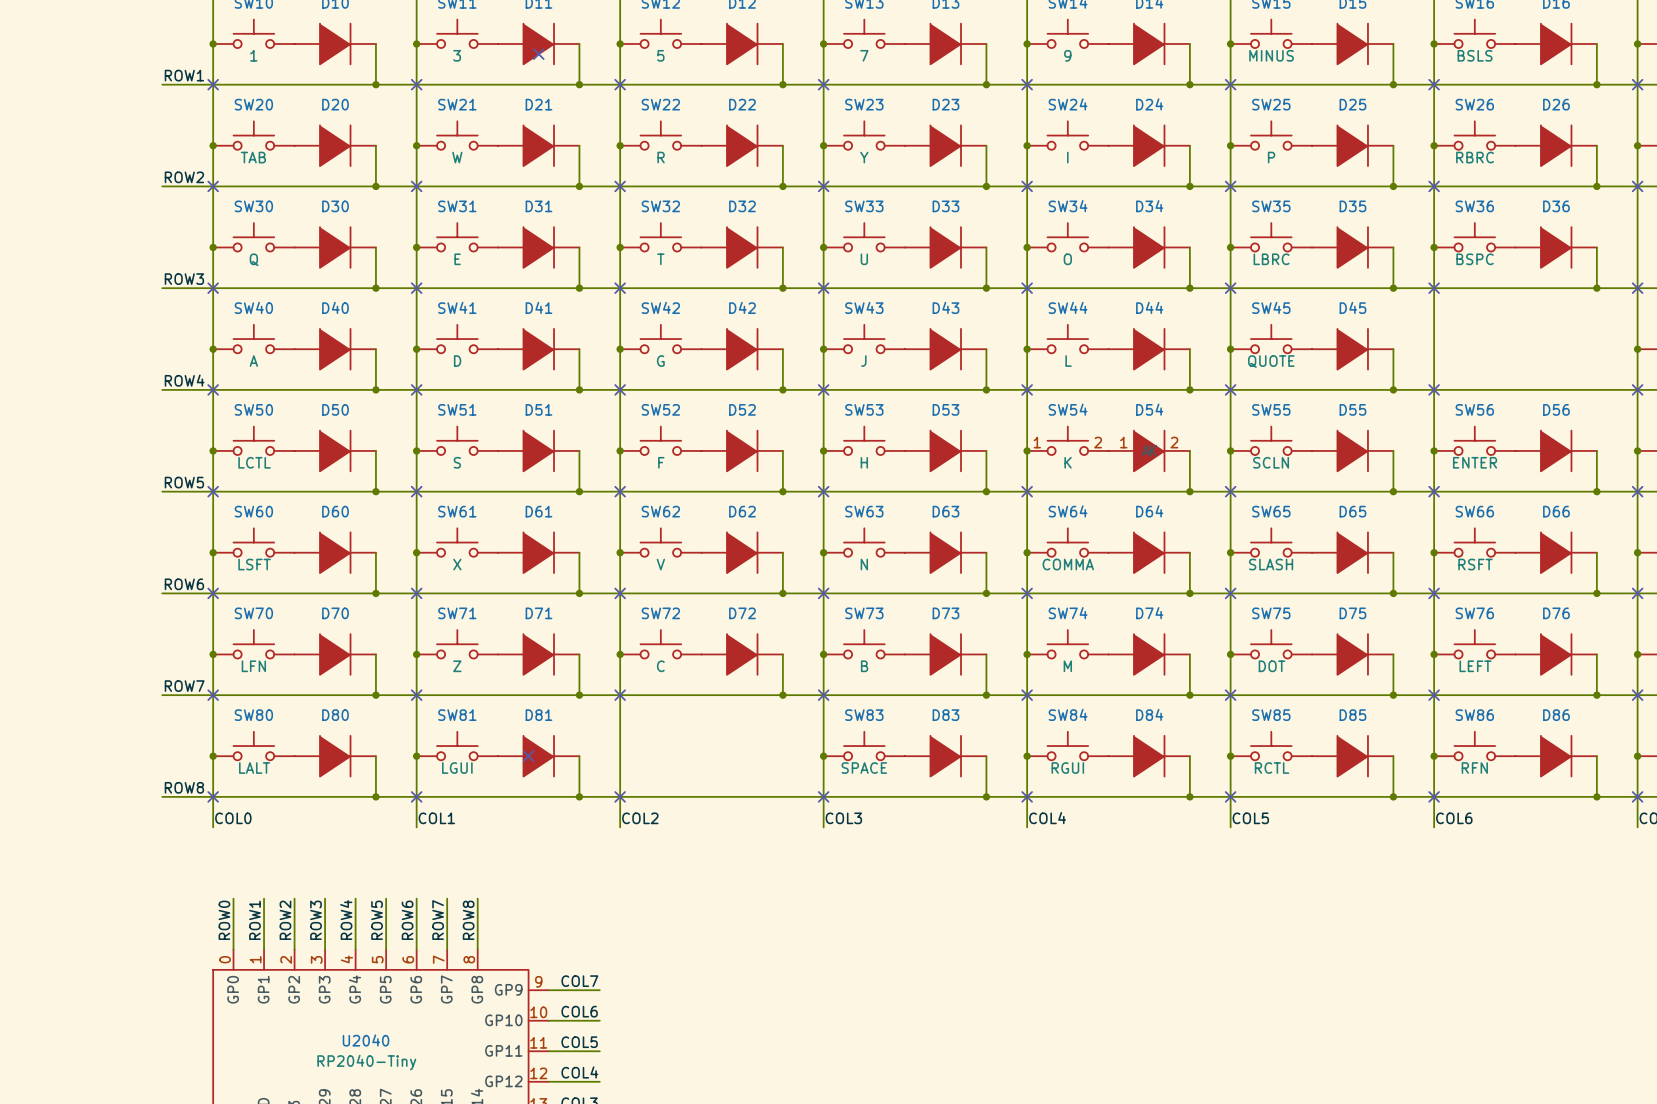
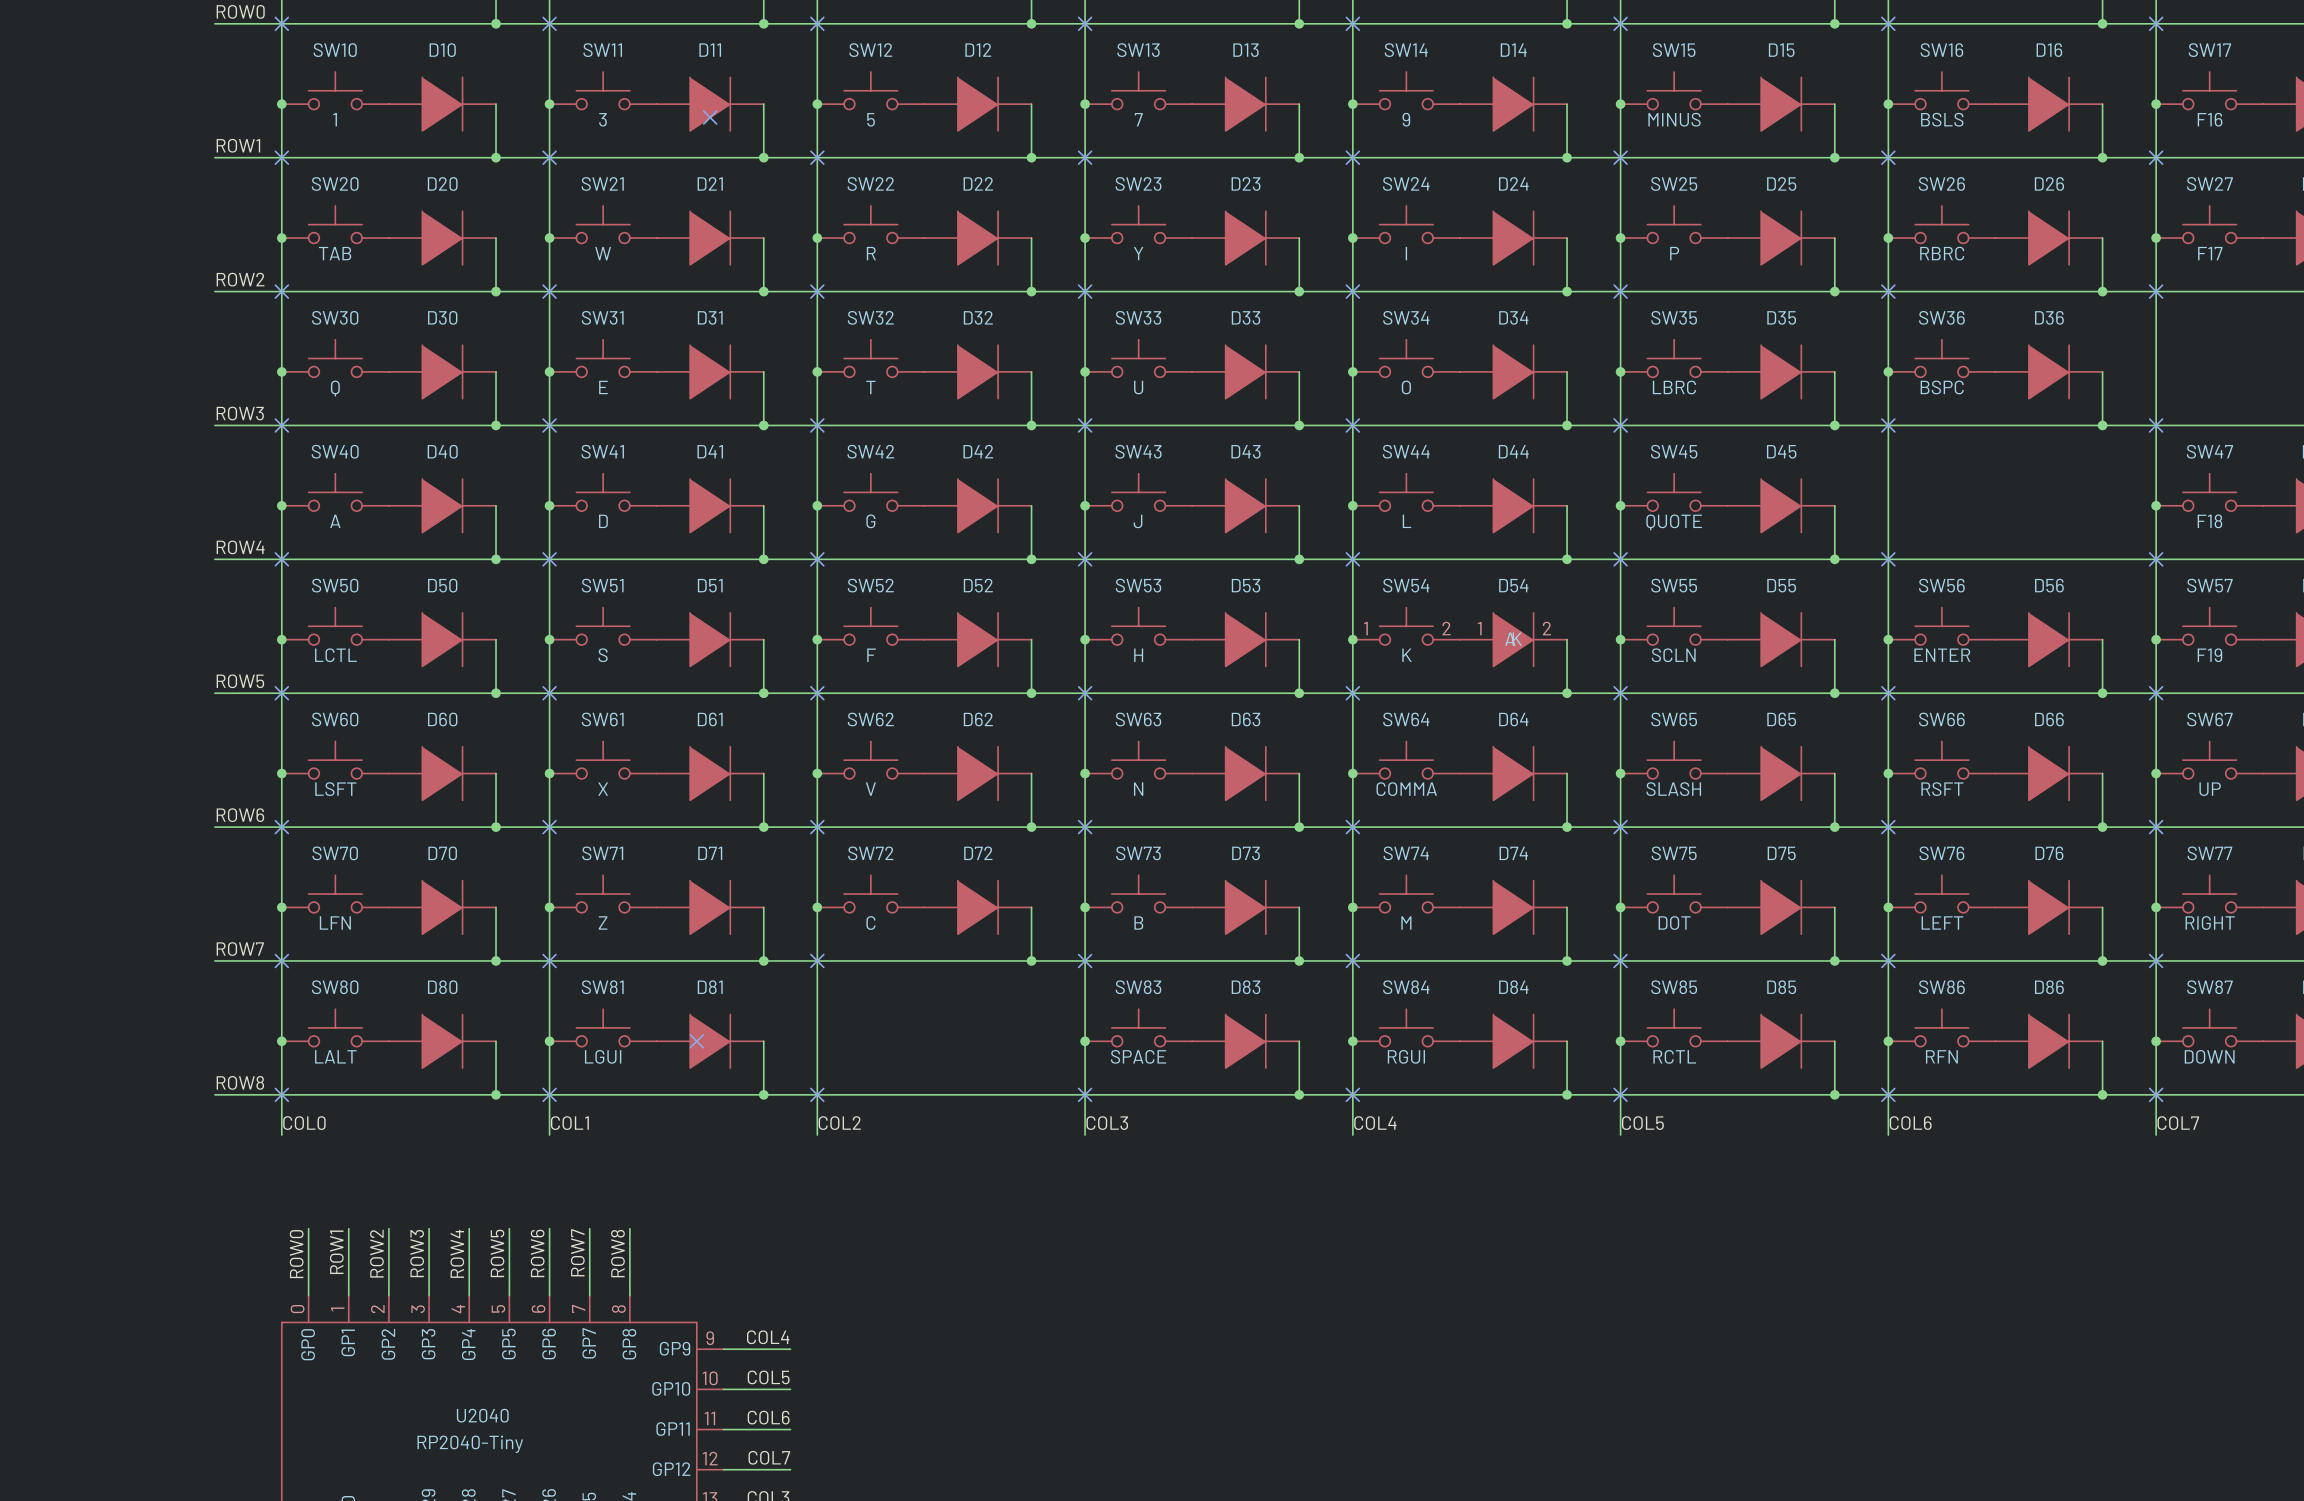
label: COL7 (579, 981) -> COL4 (768, 1337)
label: COL6 (579, 1011) -> COL5 (768, 1377)
label: COL5 (579, 1042) -> COL6 (768, 1417)
label: COL4 (579, 1072) -> COL7 (769, 1457)

